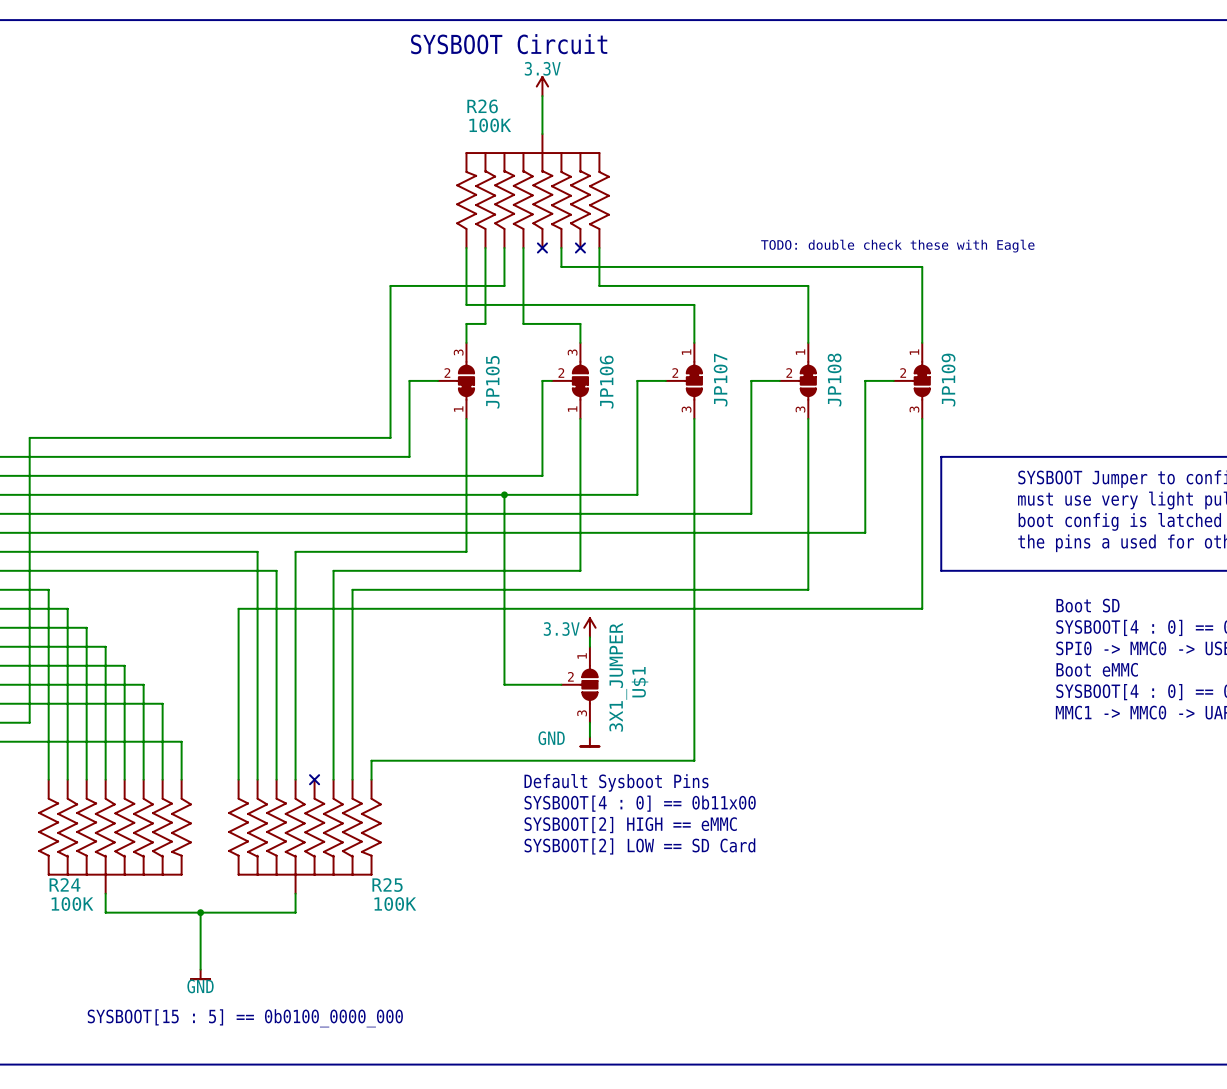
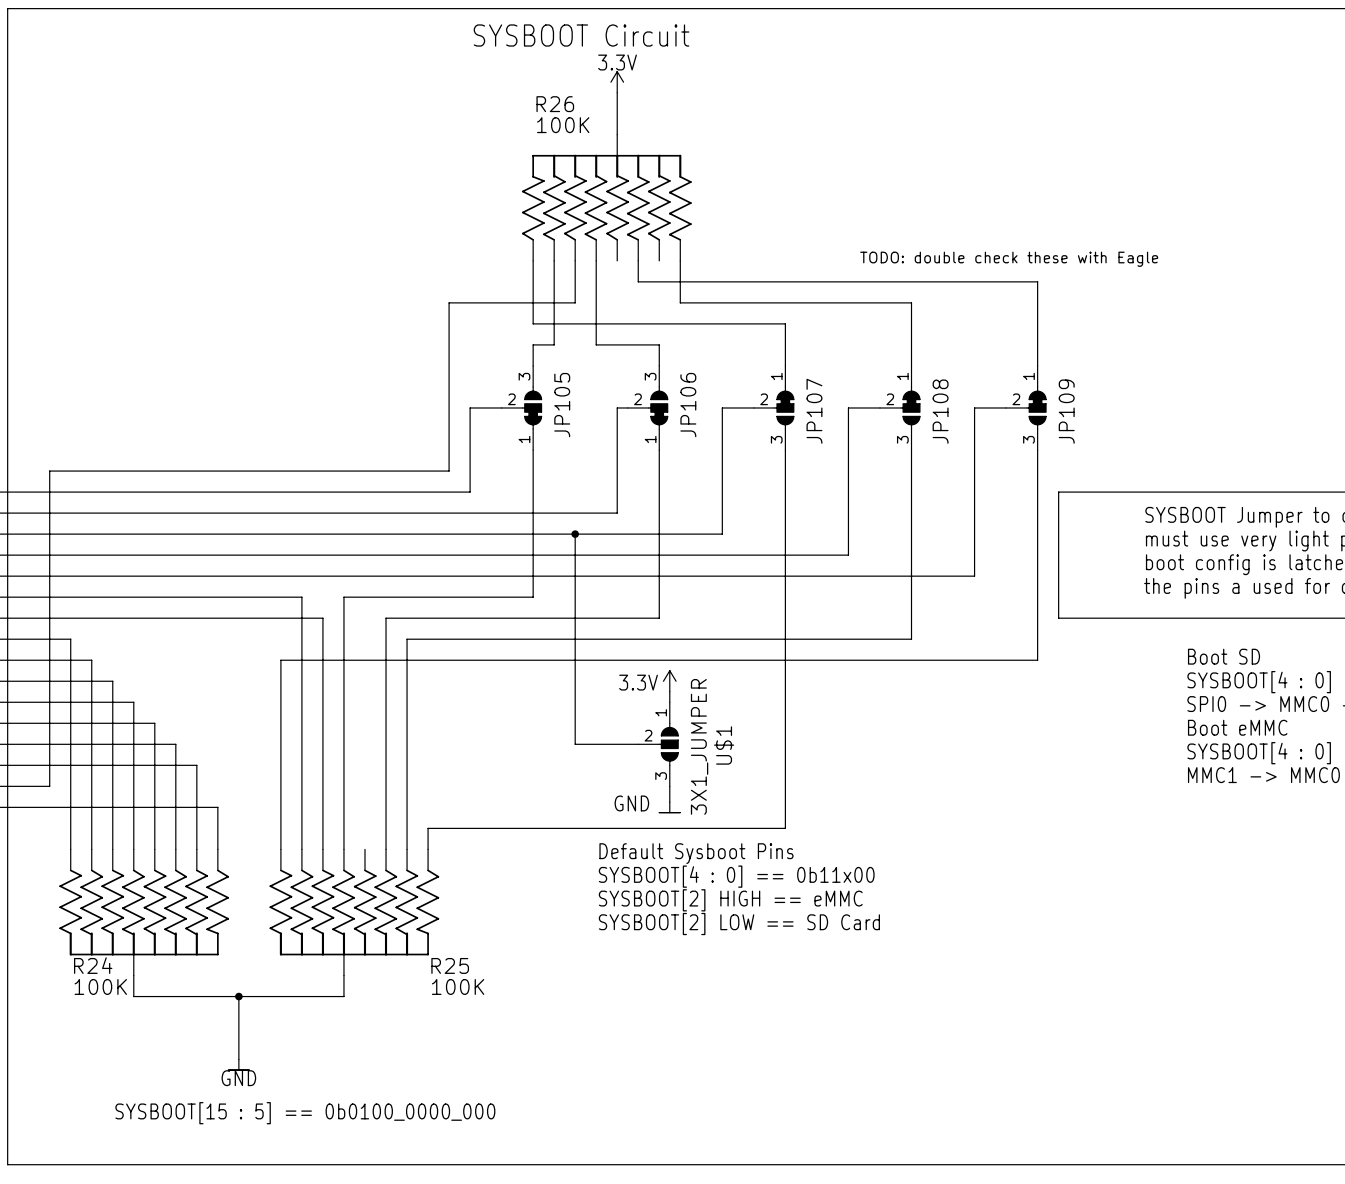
no-connect mark: (542, 247) -> none
no-connect mark: (580, 247) -> none
no-connect mark: (314, 779) -> none

